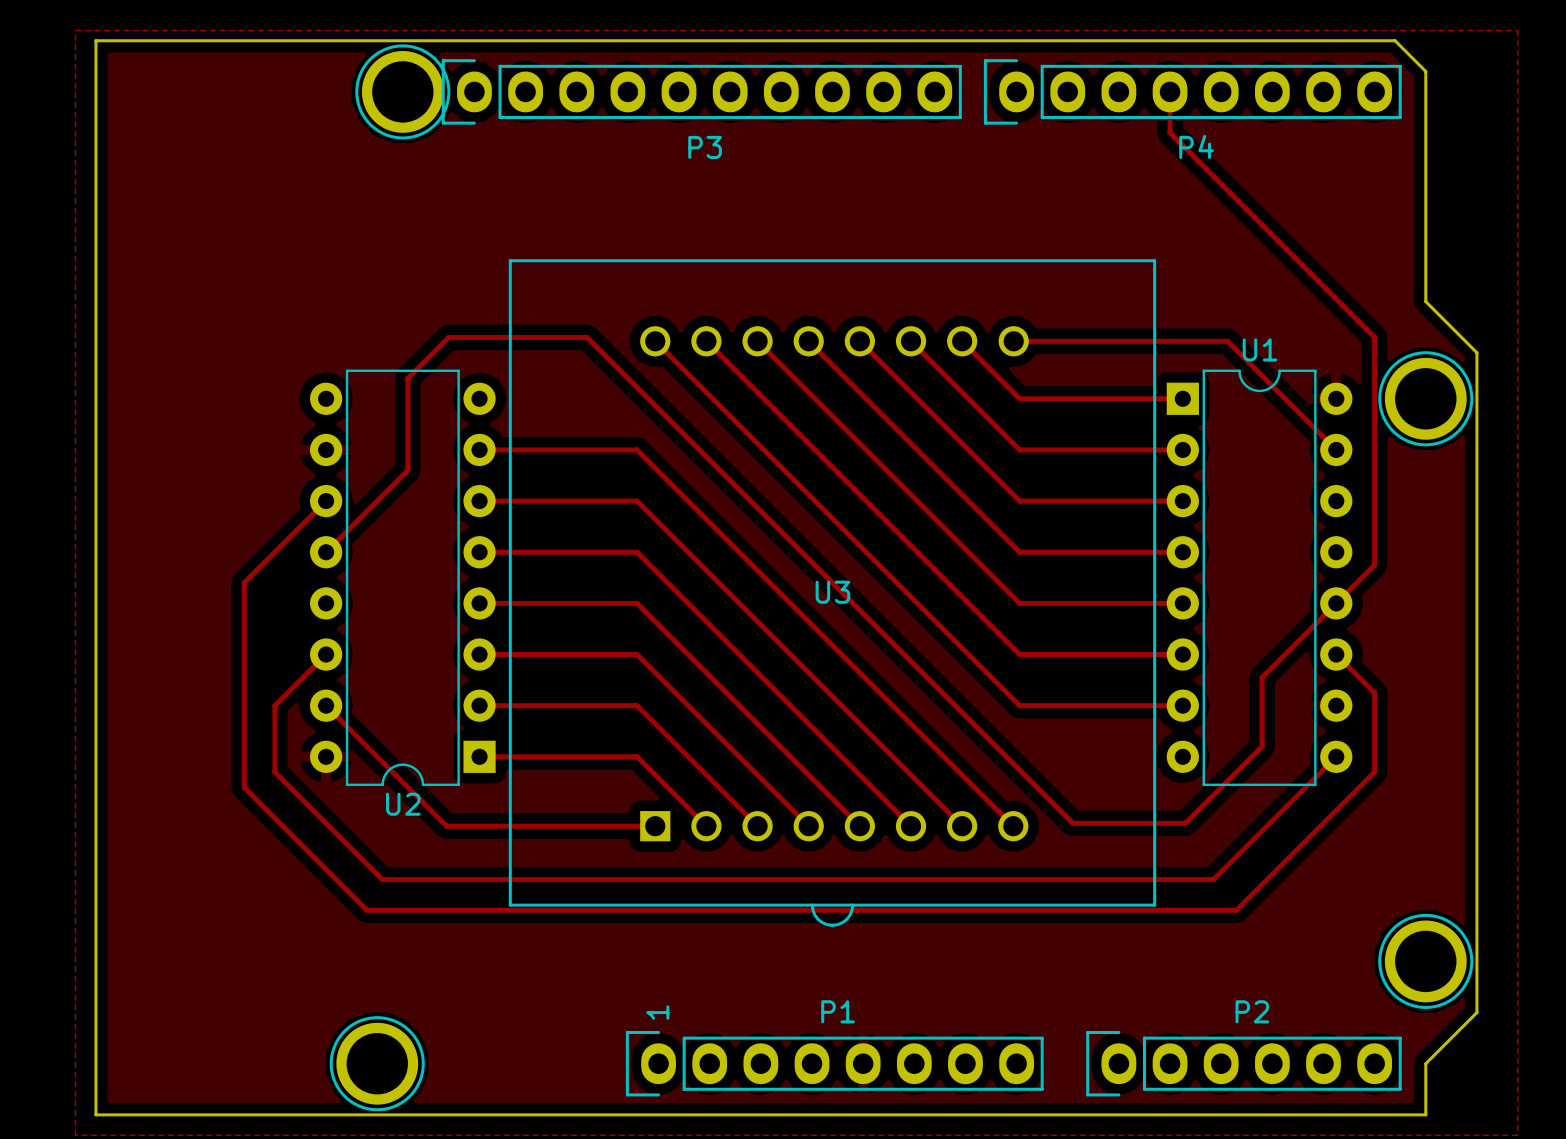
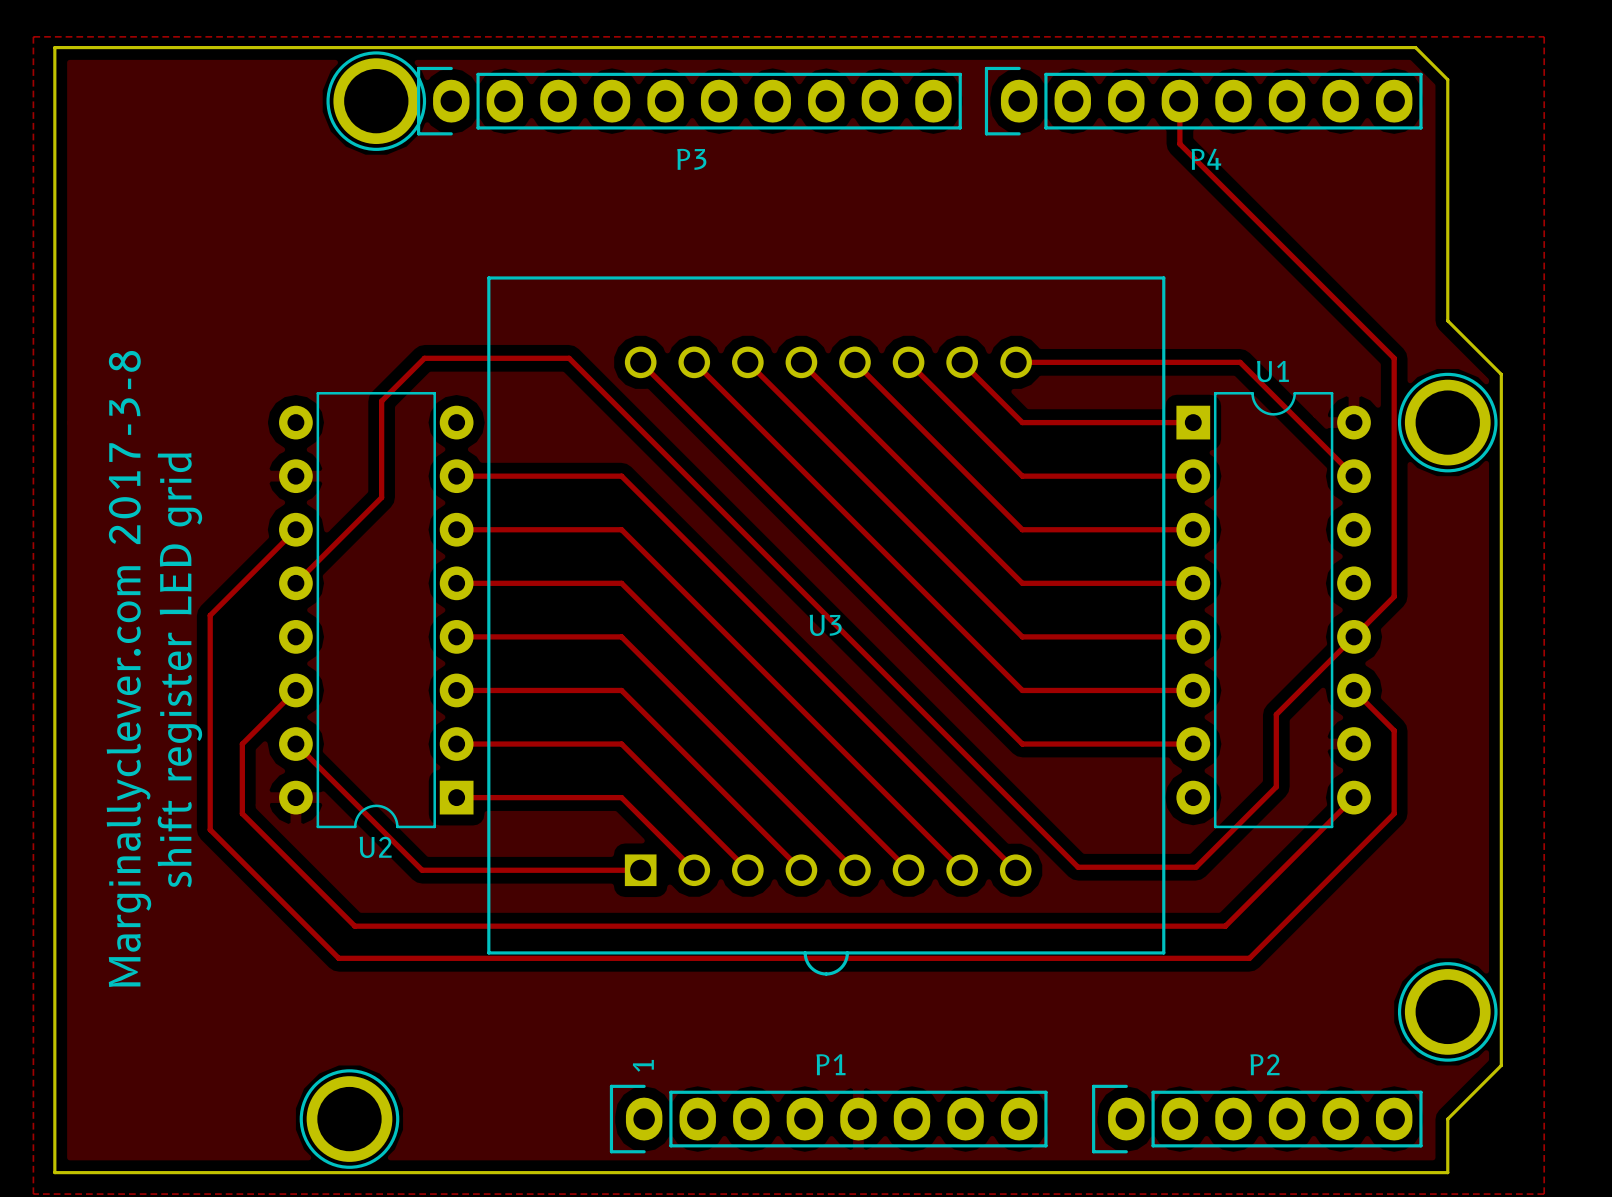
text: none -> Marginallyclever.com 2017-3-8 (128, 668)
text: none -> shift register LED grid (179, 670)

